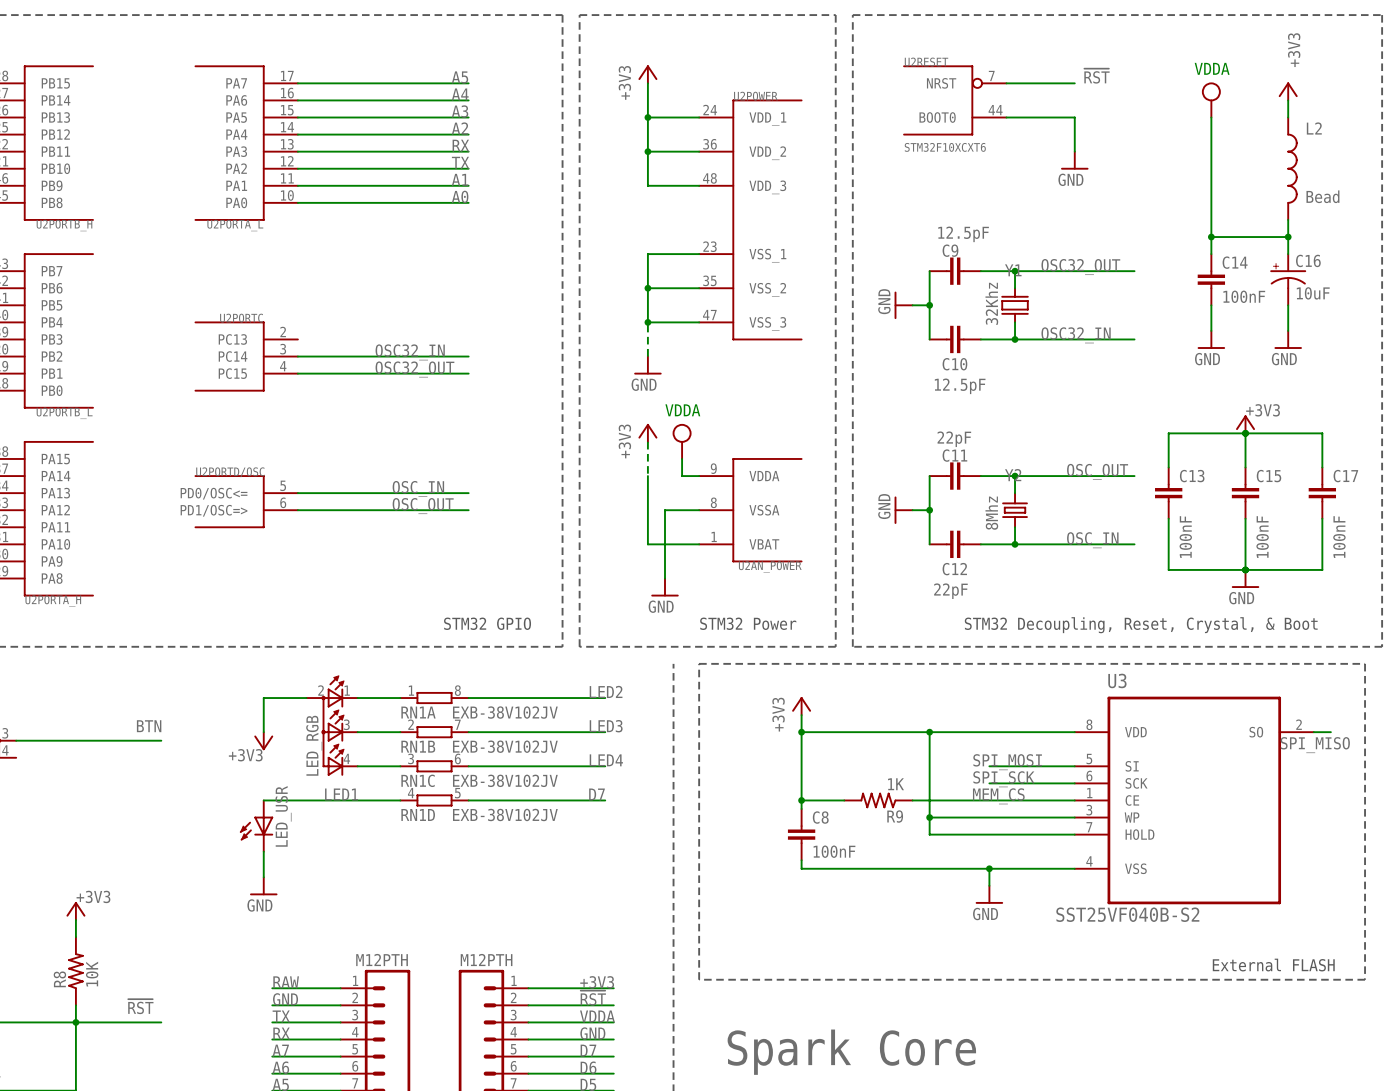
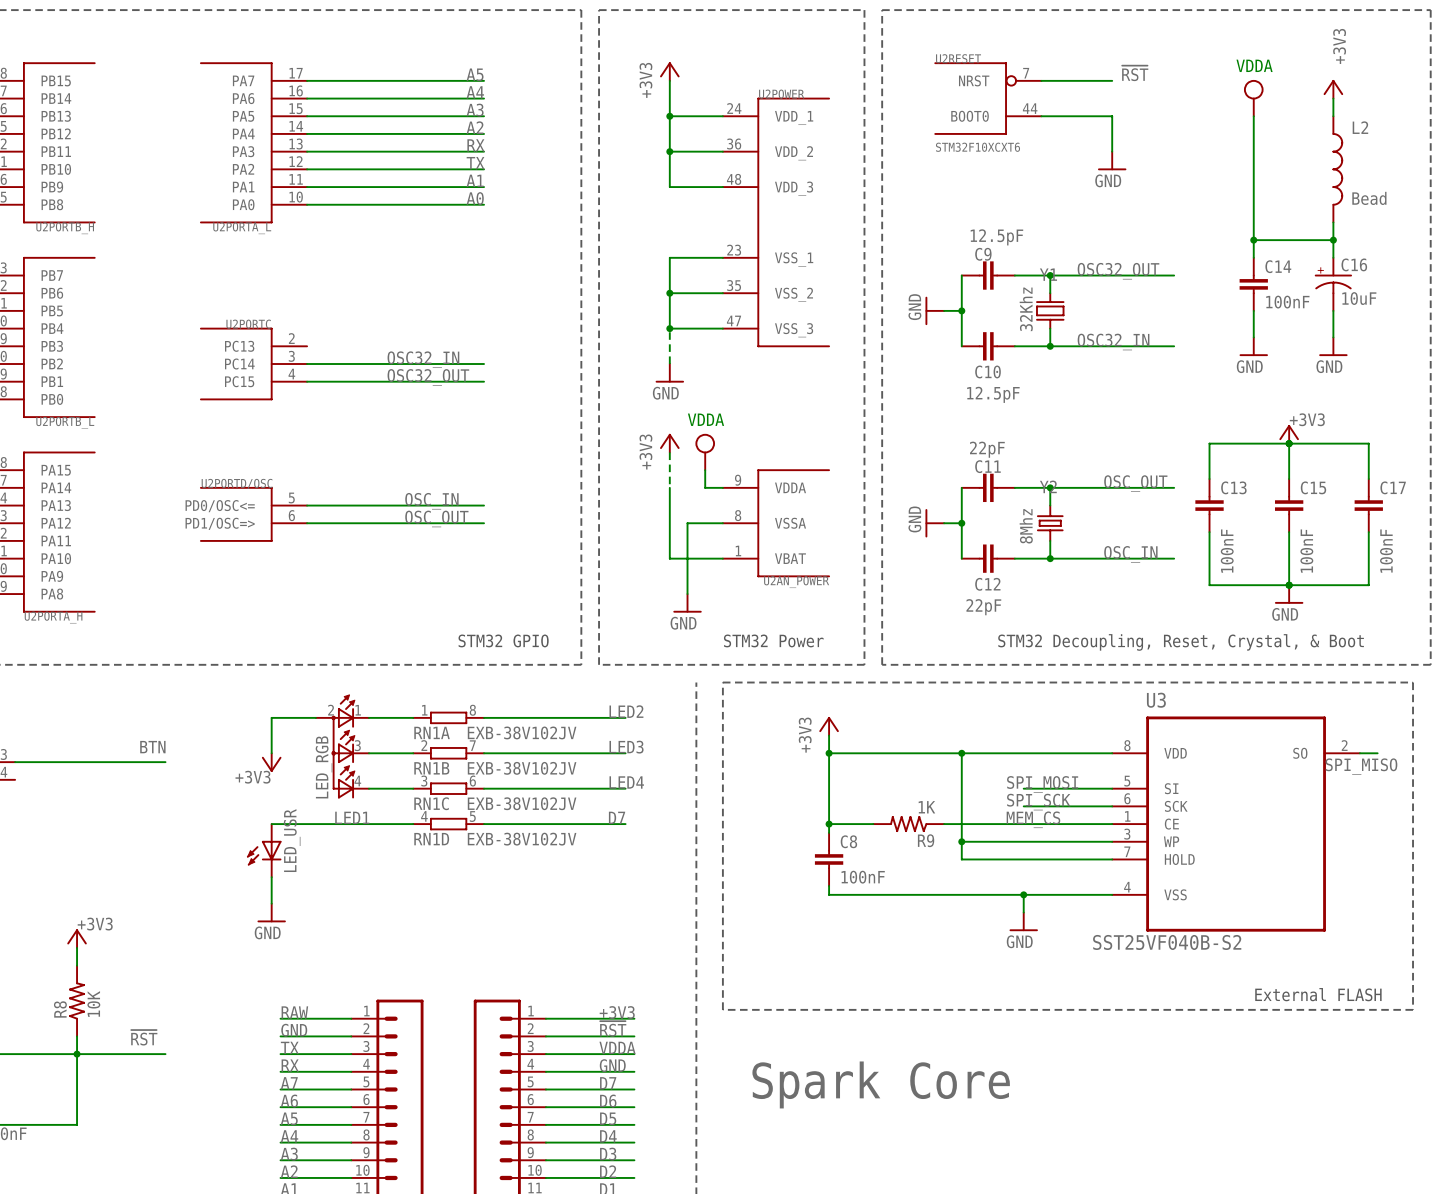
part value: M12PTH (382, 960) -> none
part value: M12PTH (486, 960) -> none

